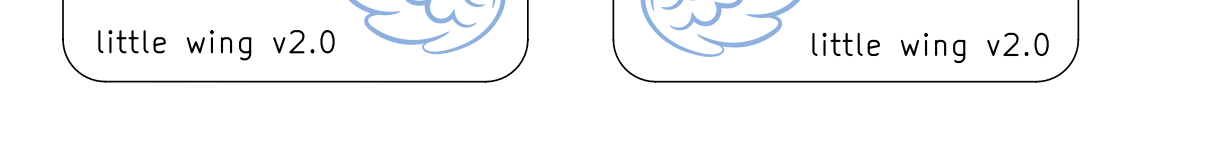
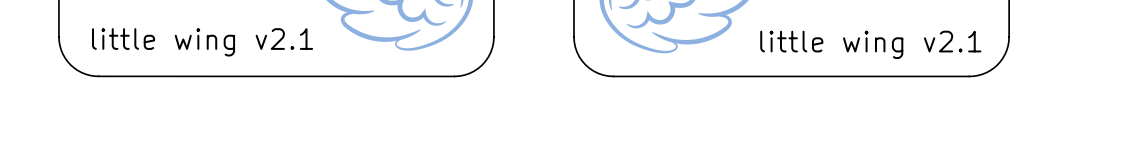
text: little wing v2.0 (216, 45) -> little wing v2.1 (202, 42)
text: little wing v2.0 (930, 47) -> little wing v2.1 (870, 44)

